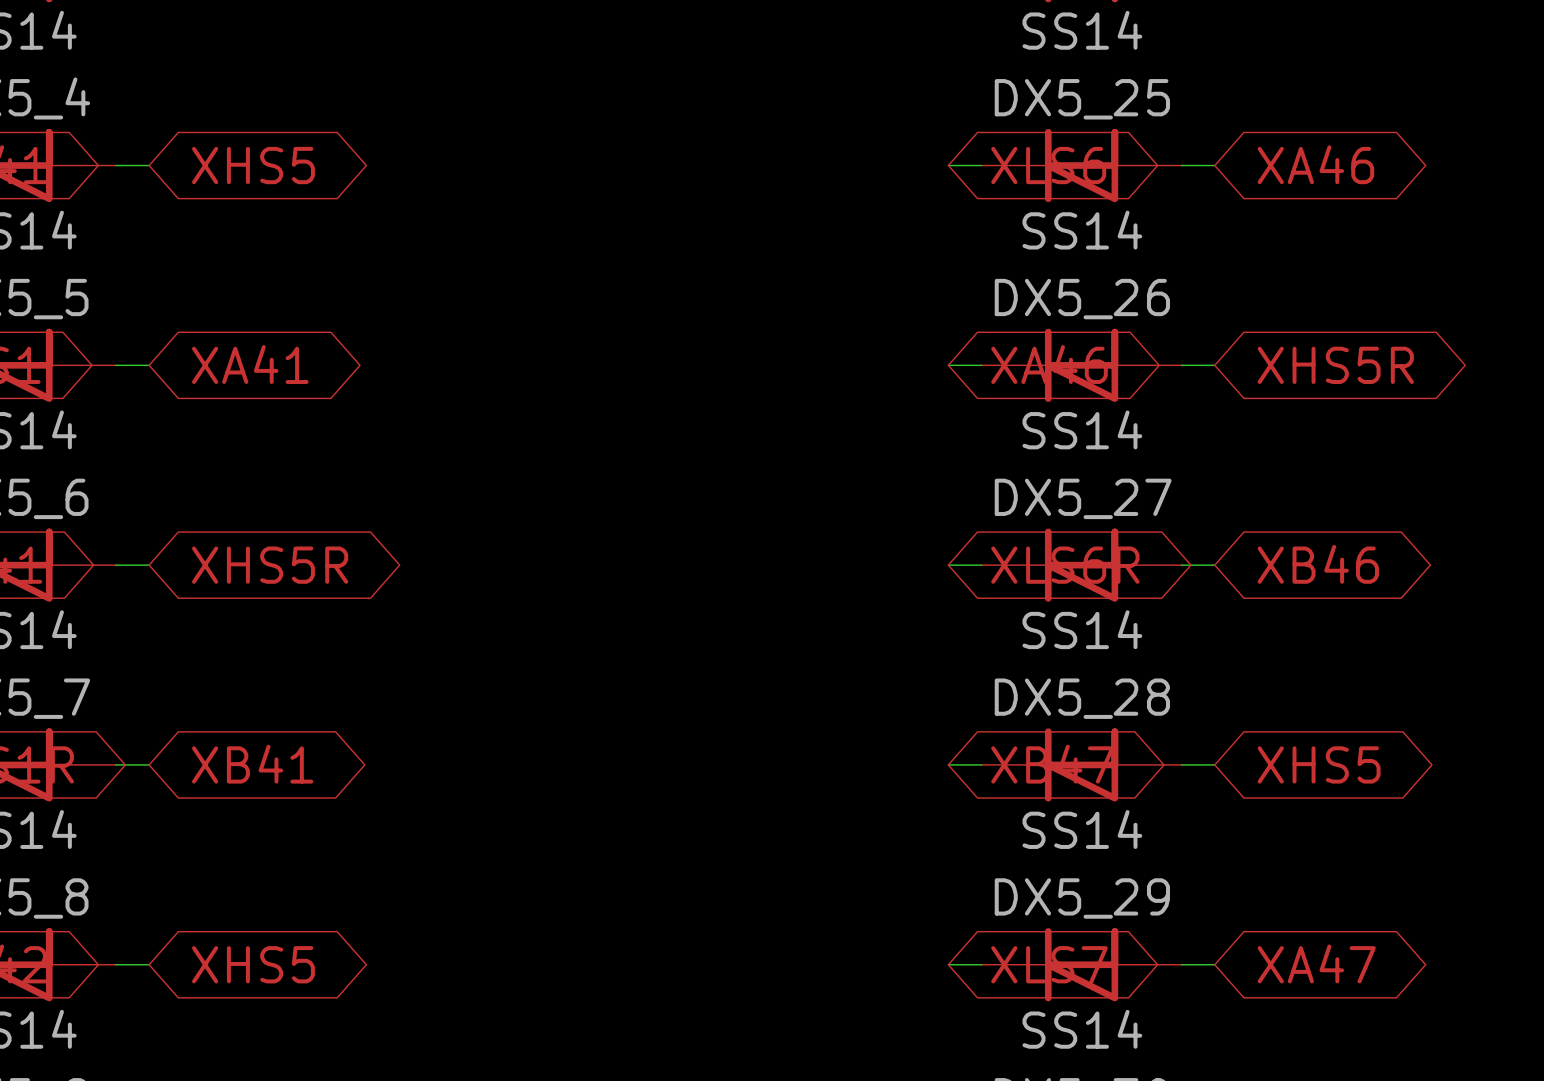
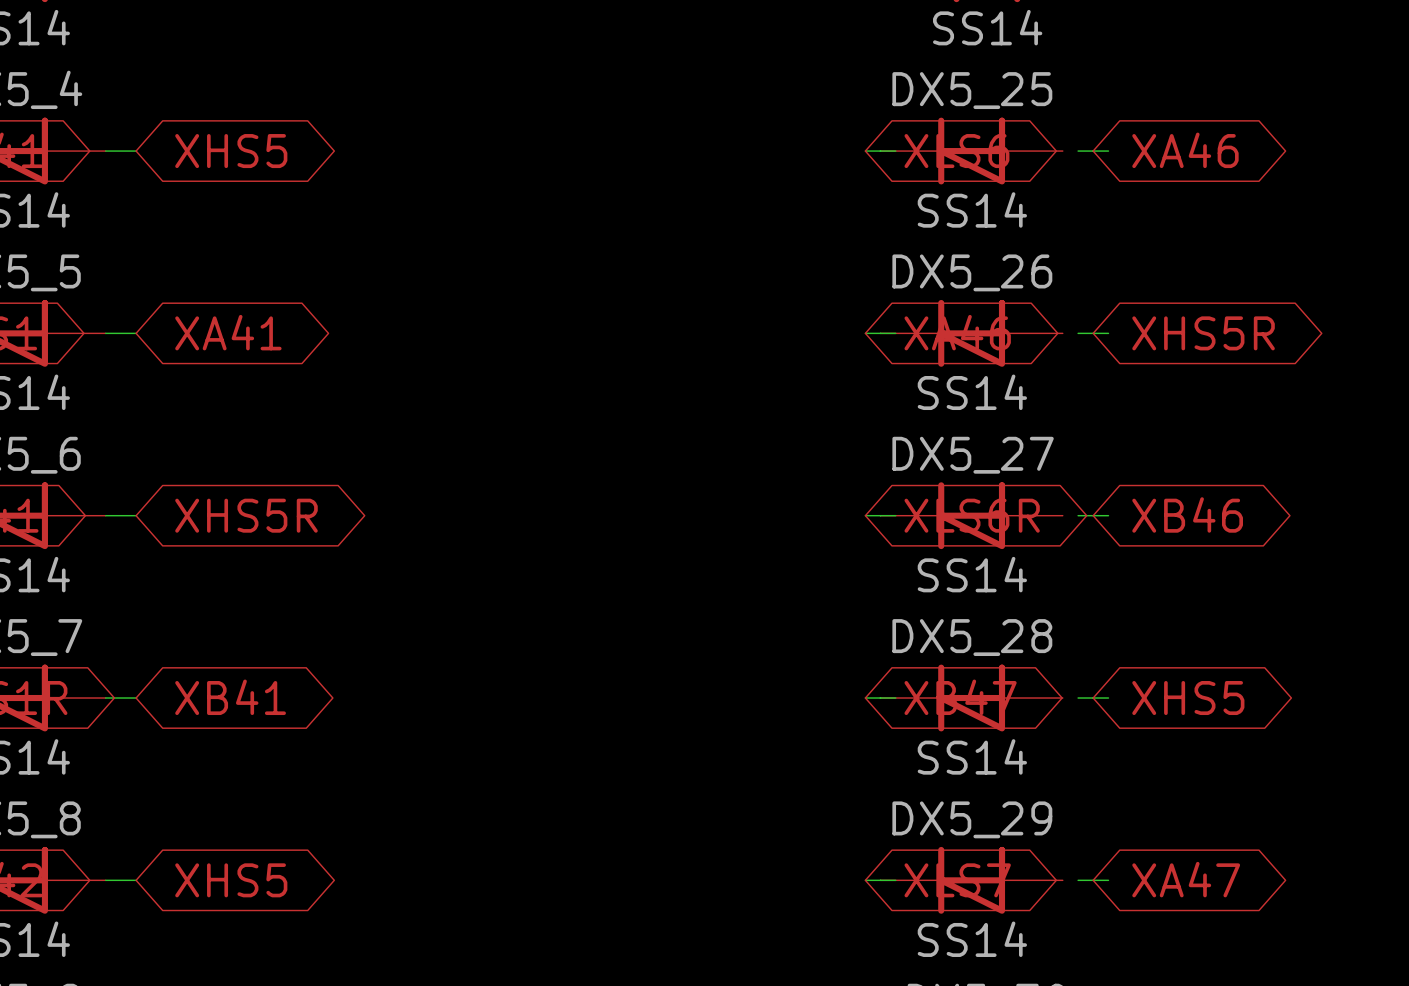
global label position: XA46 (1315, 164) -> XA46 (1185, 150)
DX5_25 position: (1081, 165) -> (971, 151)
DX5_26 position: (1081, 365) -> (971, 333)
global label position: XHS5R (1335, 365) -> XHS5R (1203, 333)
global label position: XB46 (1318, 564) -> XB46 (1187, 514)
DX5_27 position: (1081, 565) -> (971, 515)
DX5_28 position: (1081, 764) -> (971, 698)
global label position: XHS5 (1319, 764) -> XHS5 (1188, 698)
global label position: XA47 (1316, 963) -> XA47 (1186, 879)
DX5_29 position: (1081, 964) -> (971, 880)

